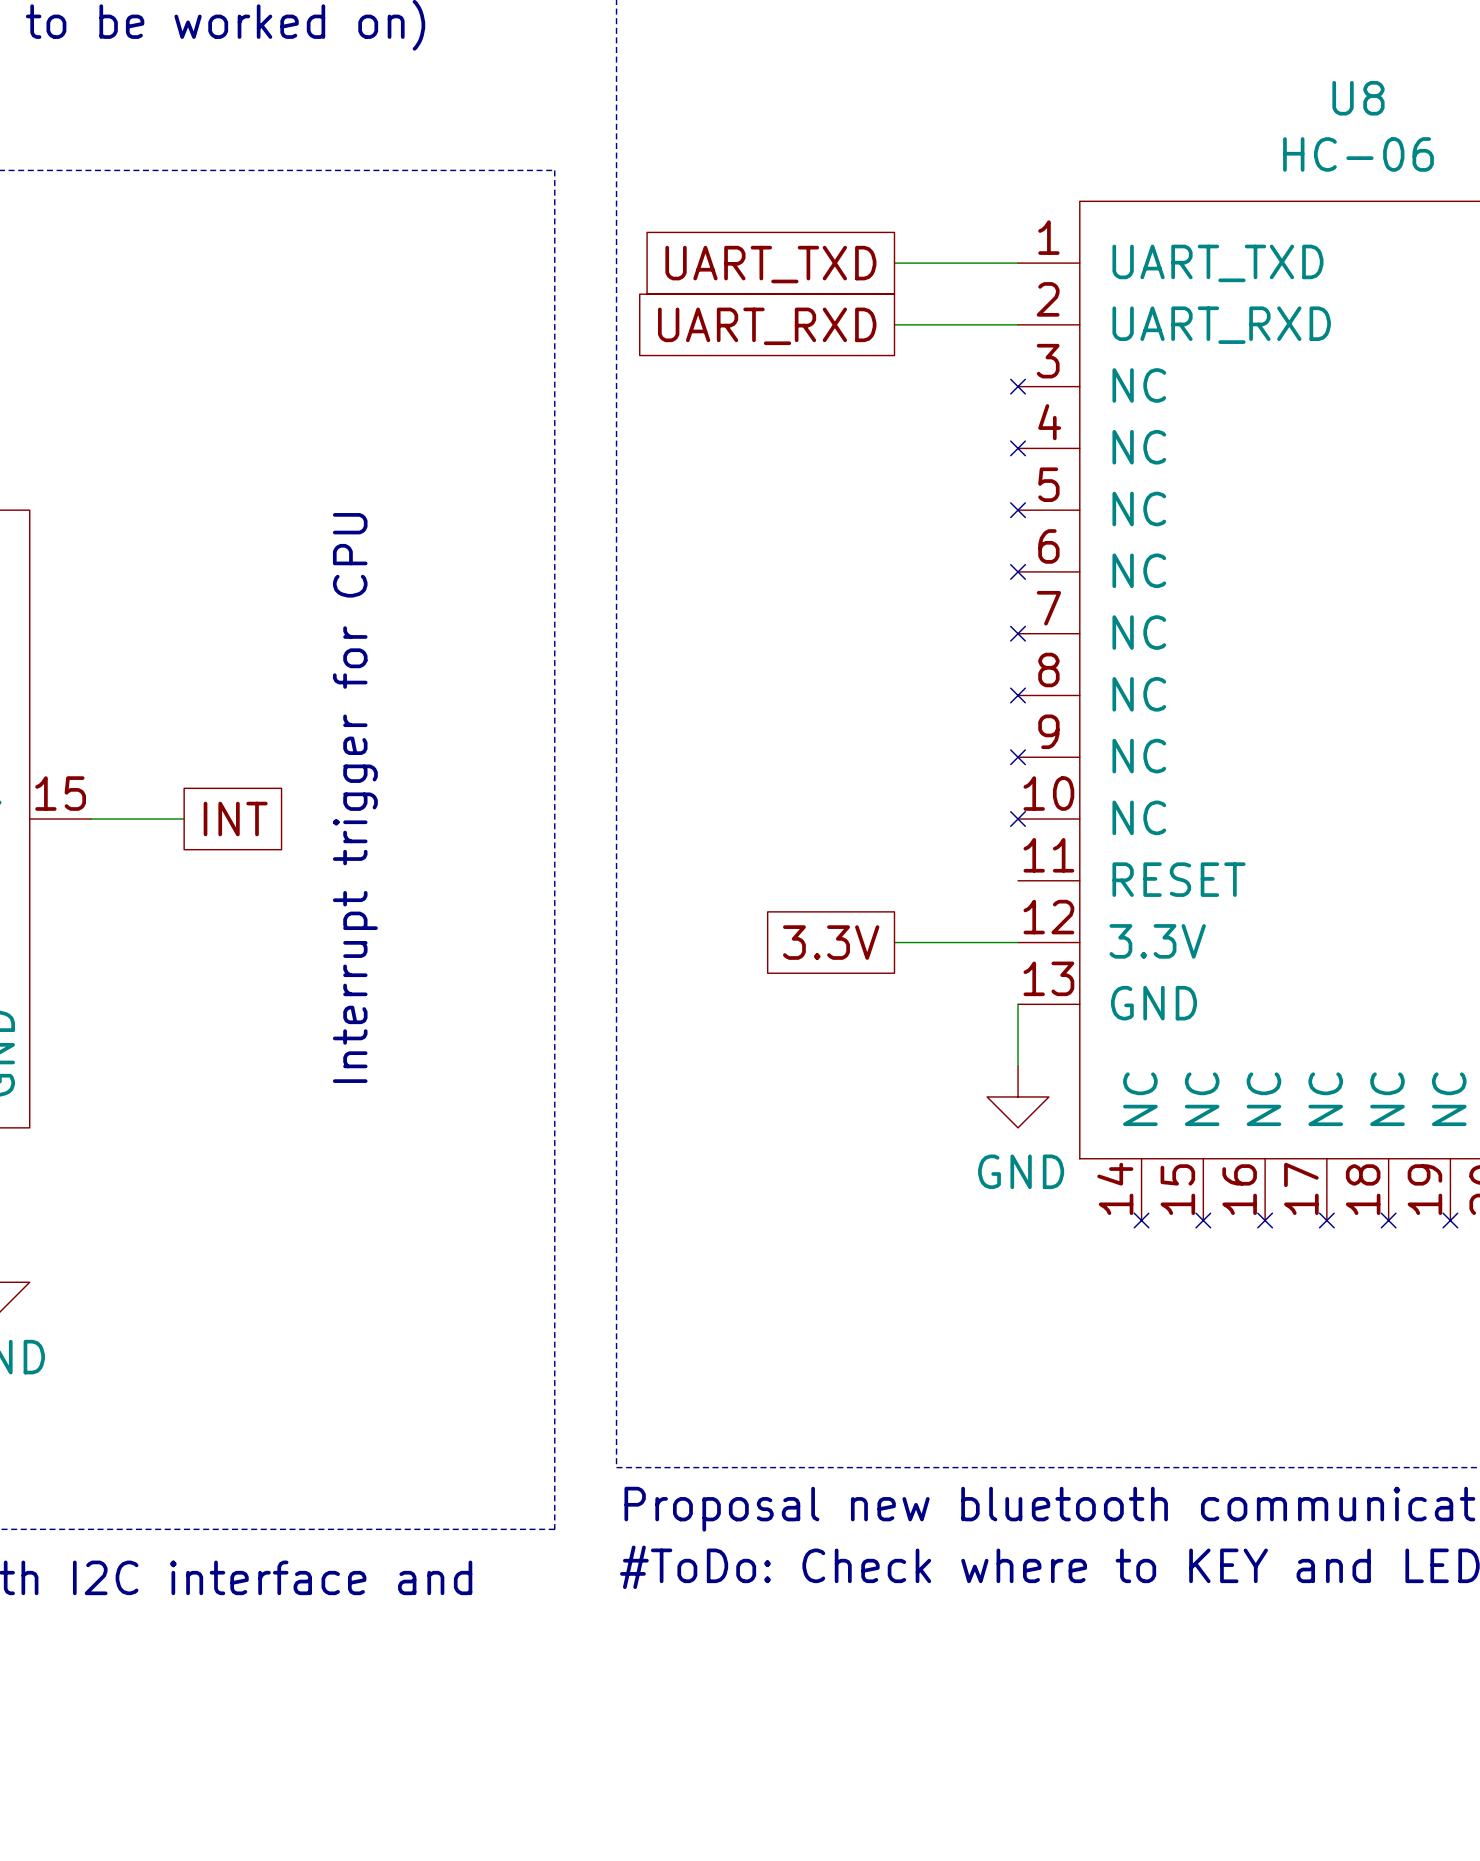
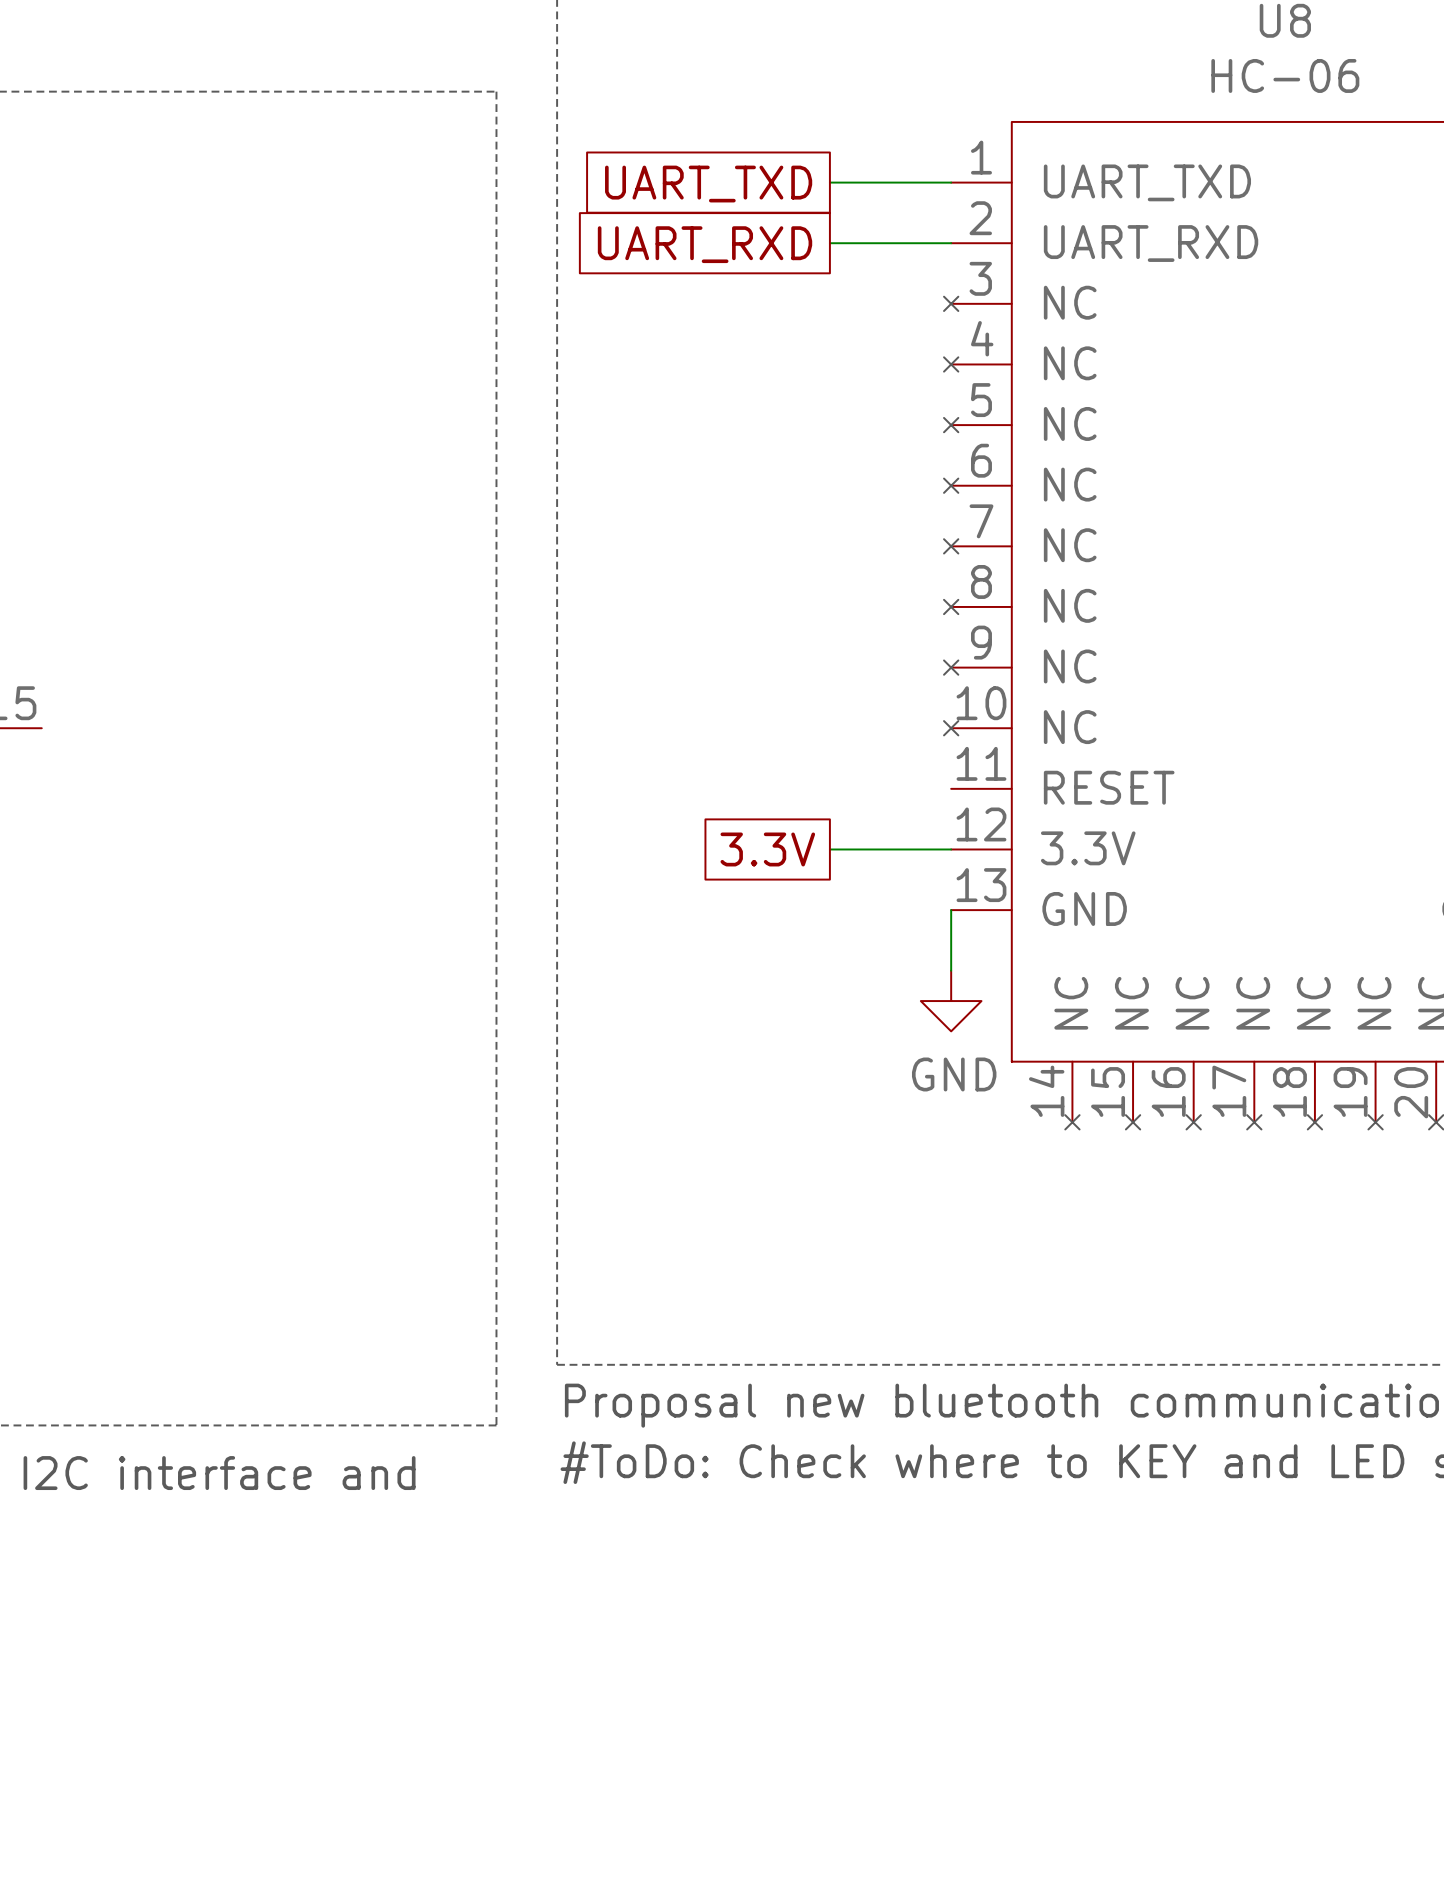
text: Interrupt trigger for CPU (355, 797) -> none
wire: (91, 819) (184, 819) -> none
global label: INT (235, 819) -> none

